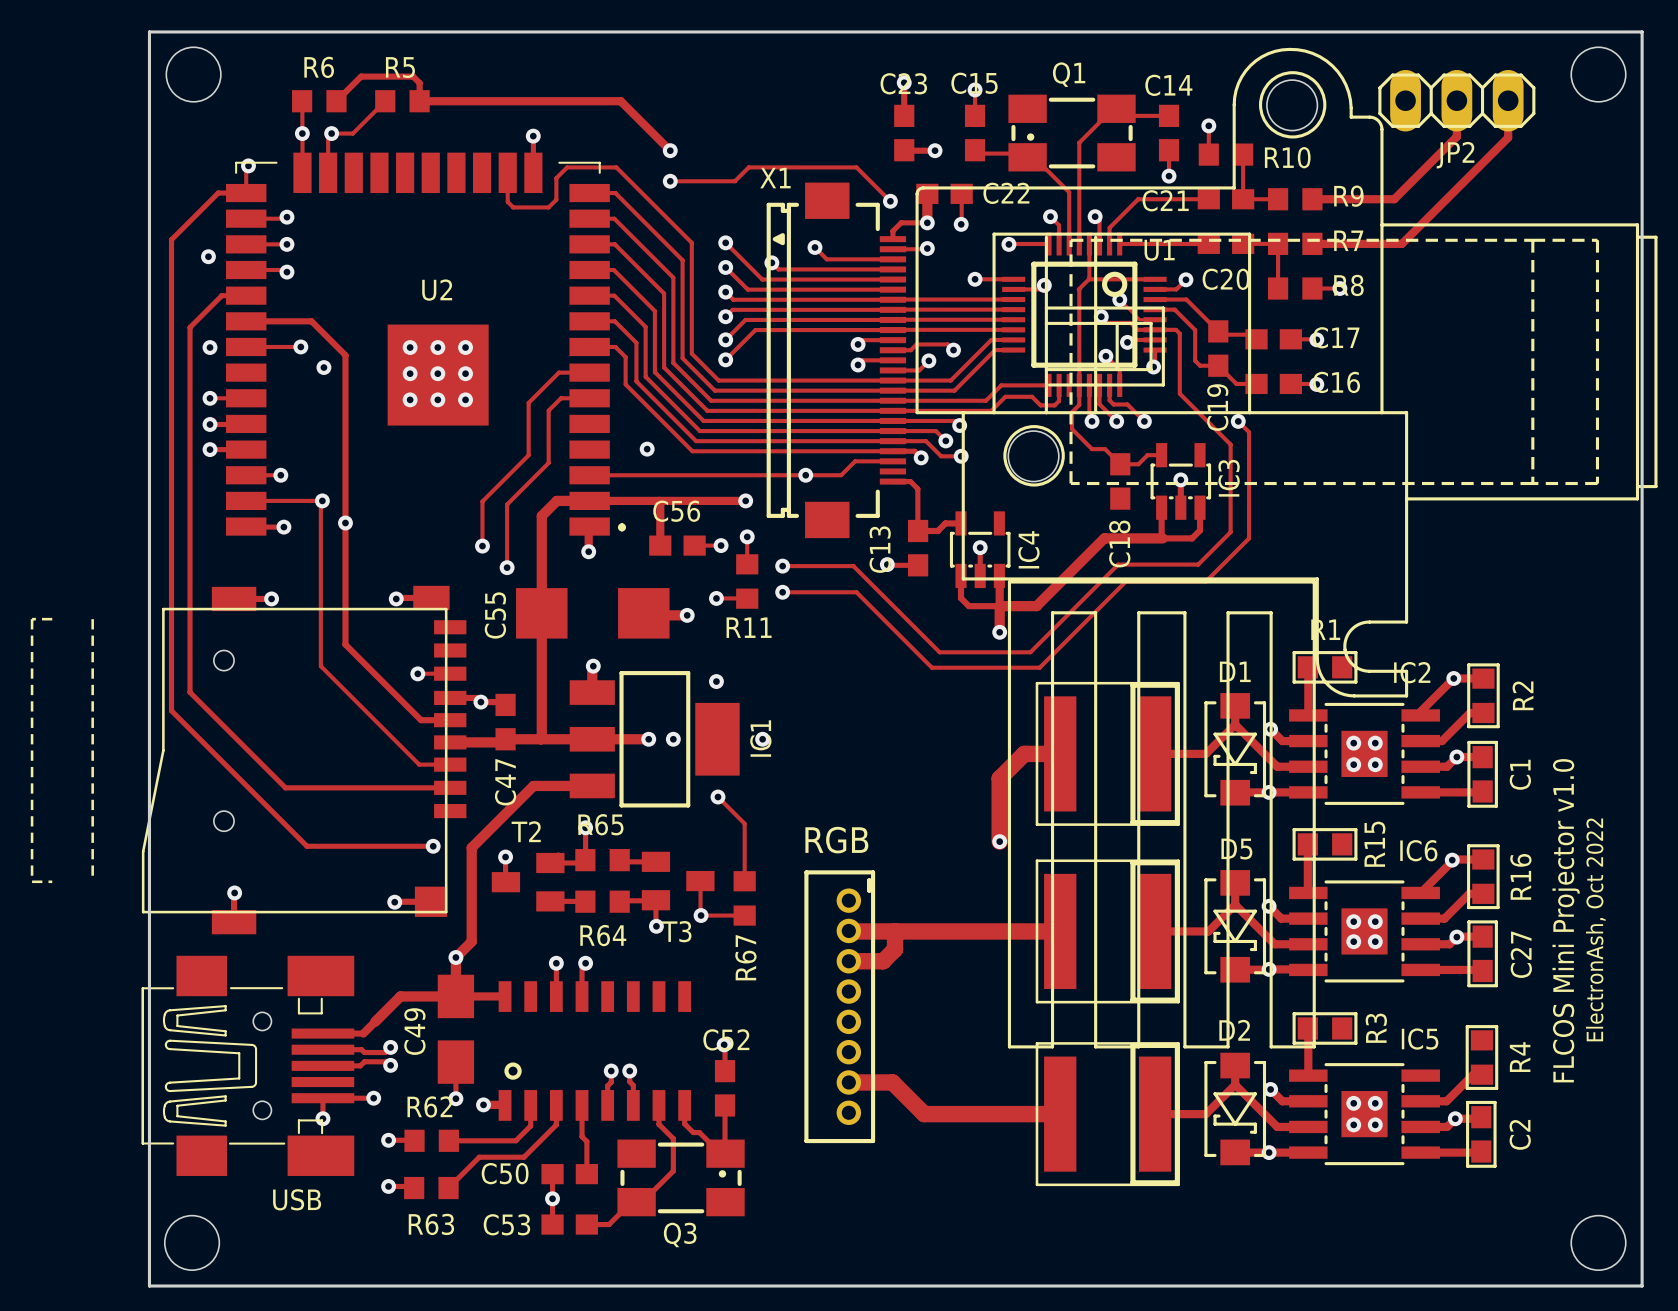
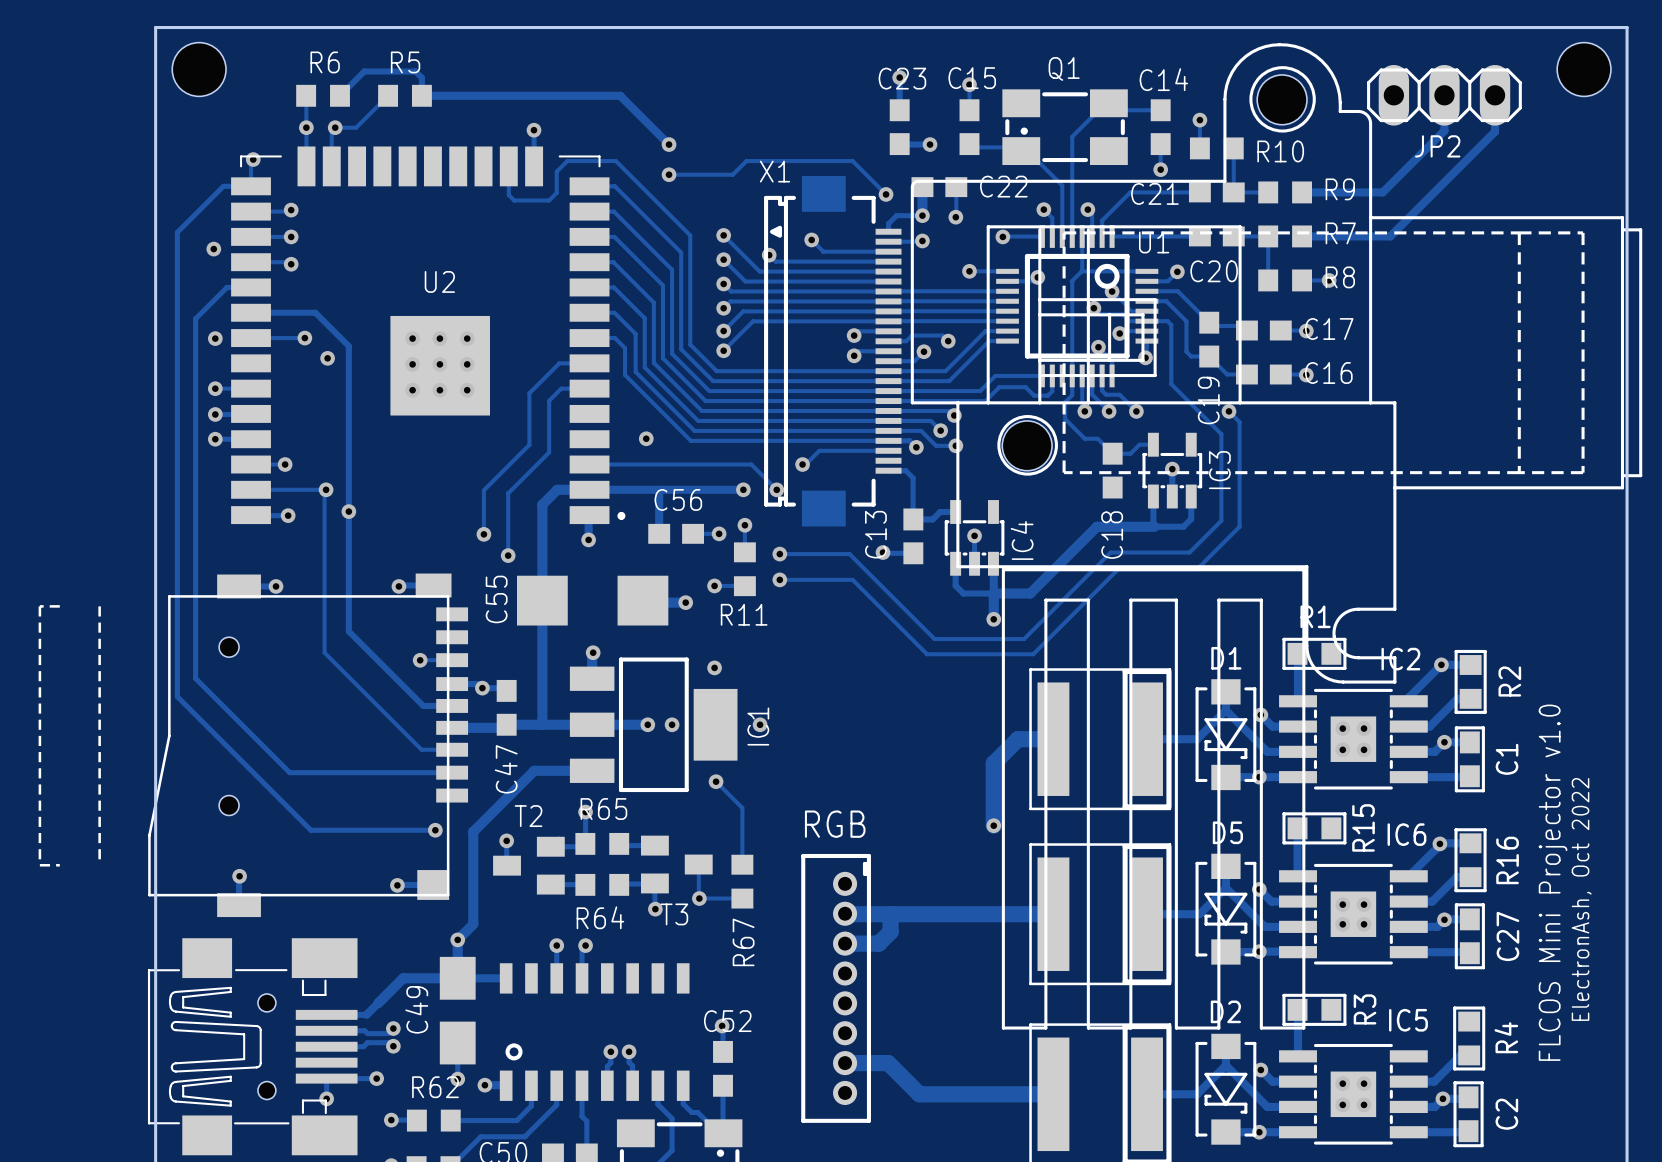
track: (855, 461) (841, 475) (753, 475) -> (851, 450) (819, 450) (807, 463)
track: none -> (751, 464) (776, 489)
via: none -> (776, 489)

